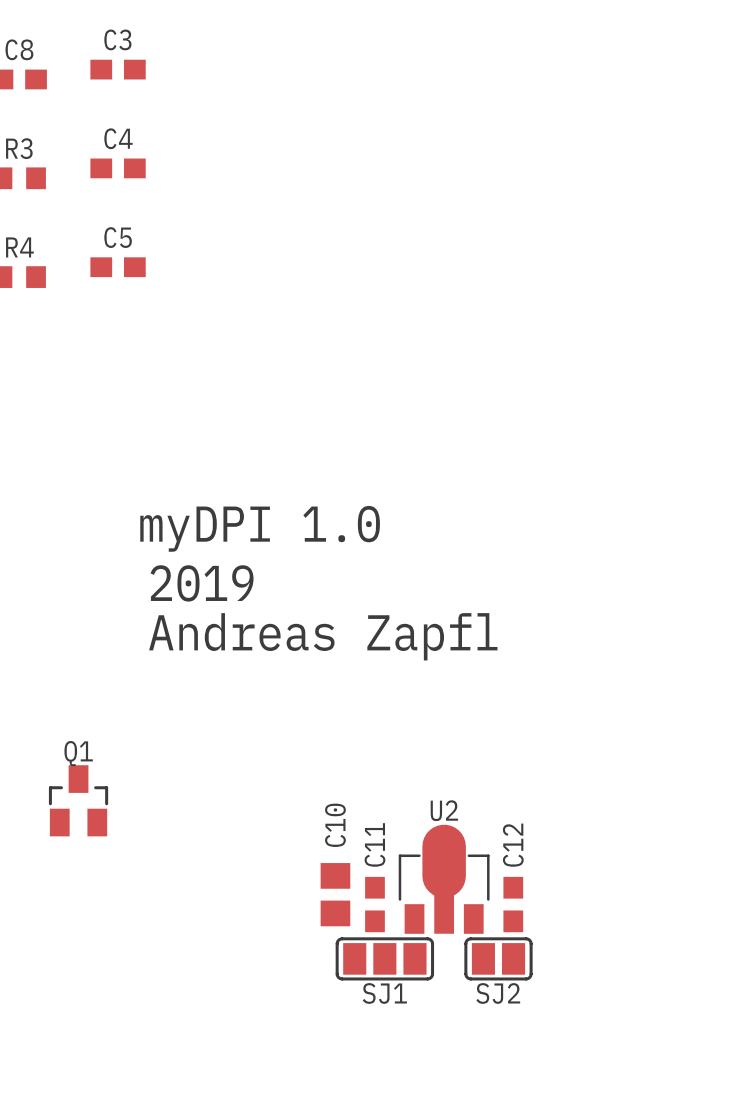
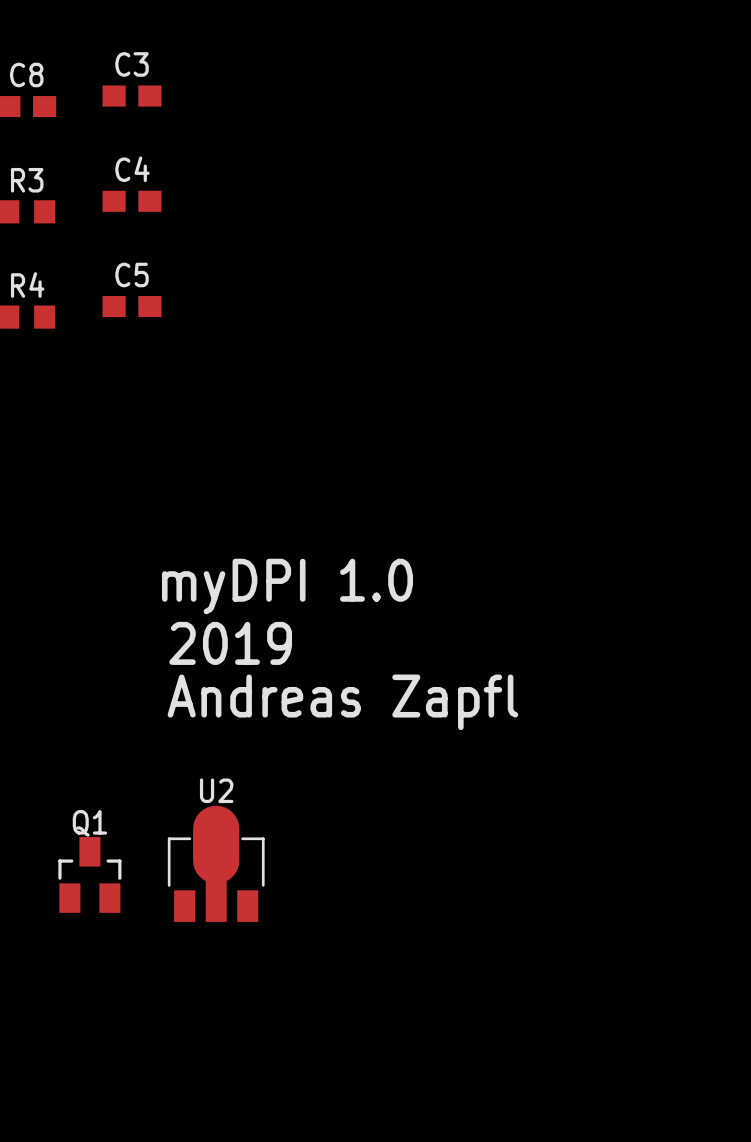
U2 position: (444, 879) -> (216, 863)
C10: (335, 894) -> none
C11: (374, 904) -> none
C12: (513, 904) -> none
SJ1: (384, 958) -> none
SJ2: (498, 958) -> none

